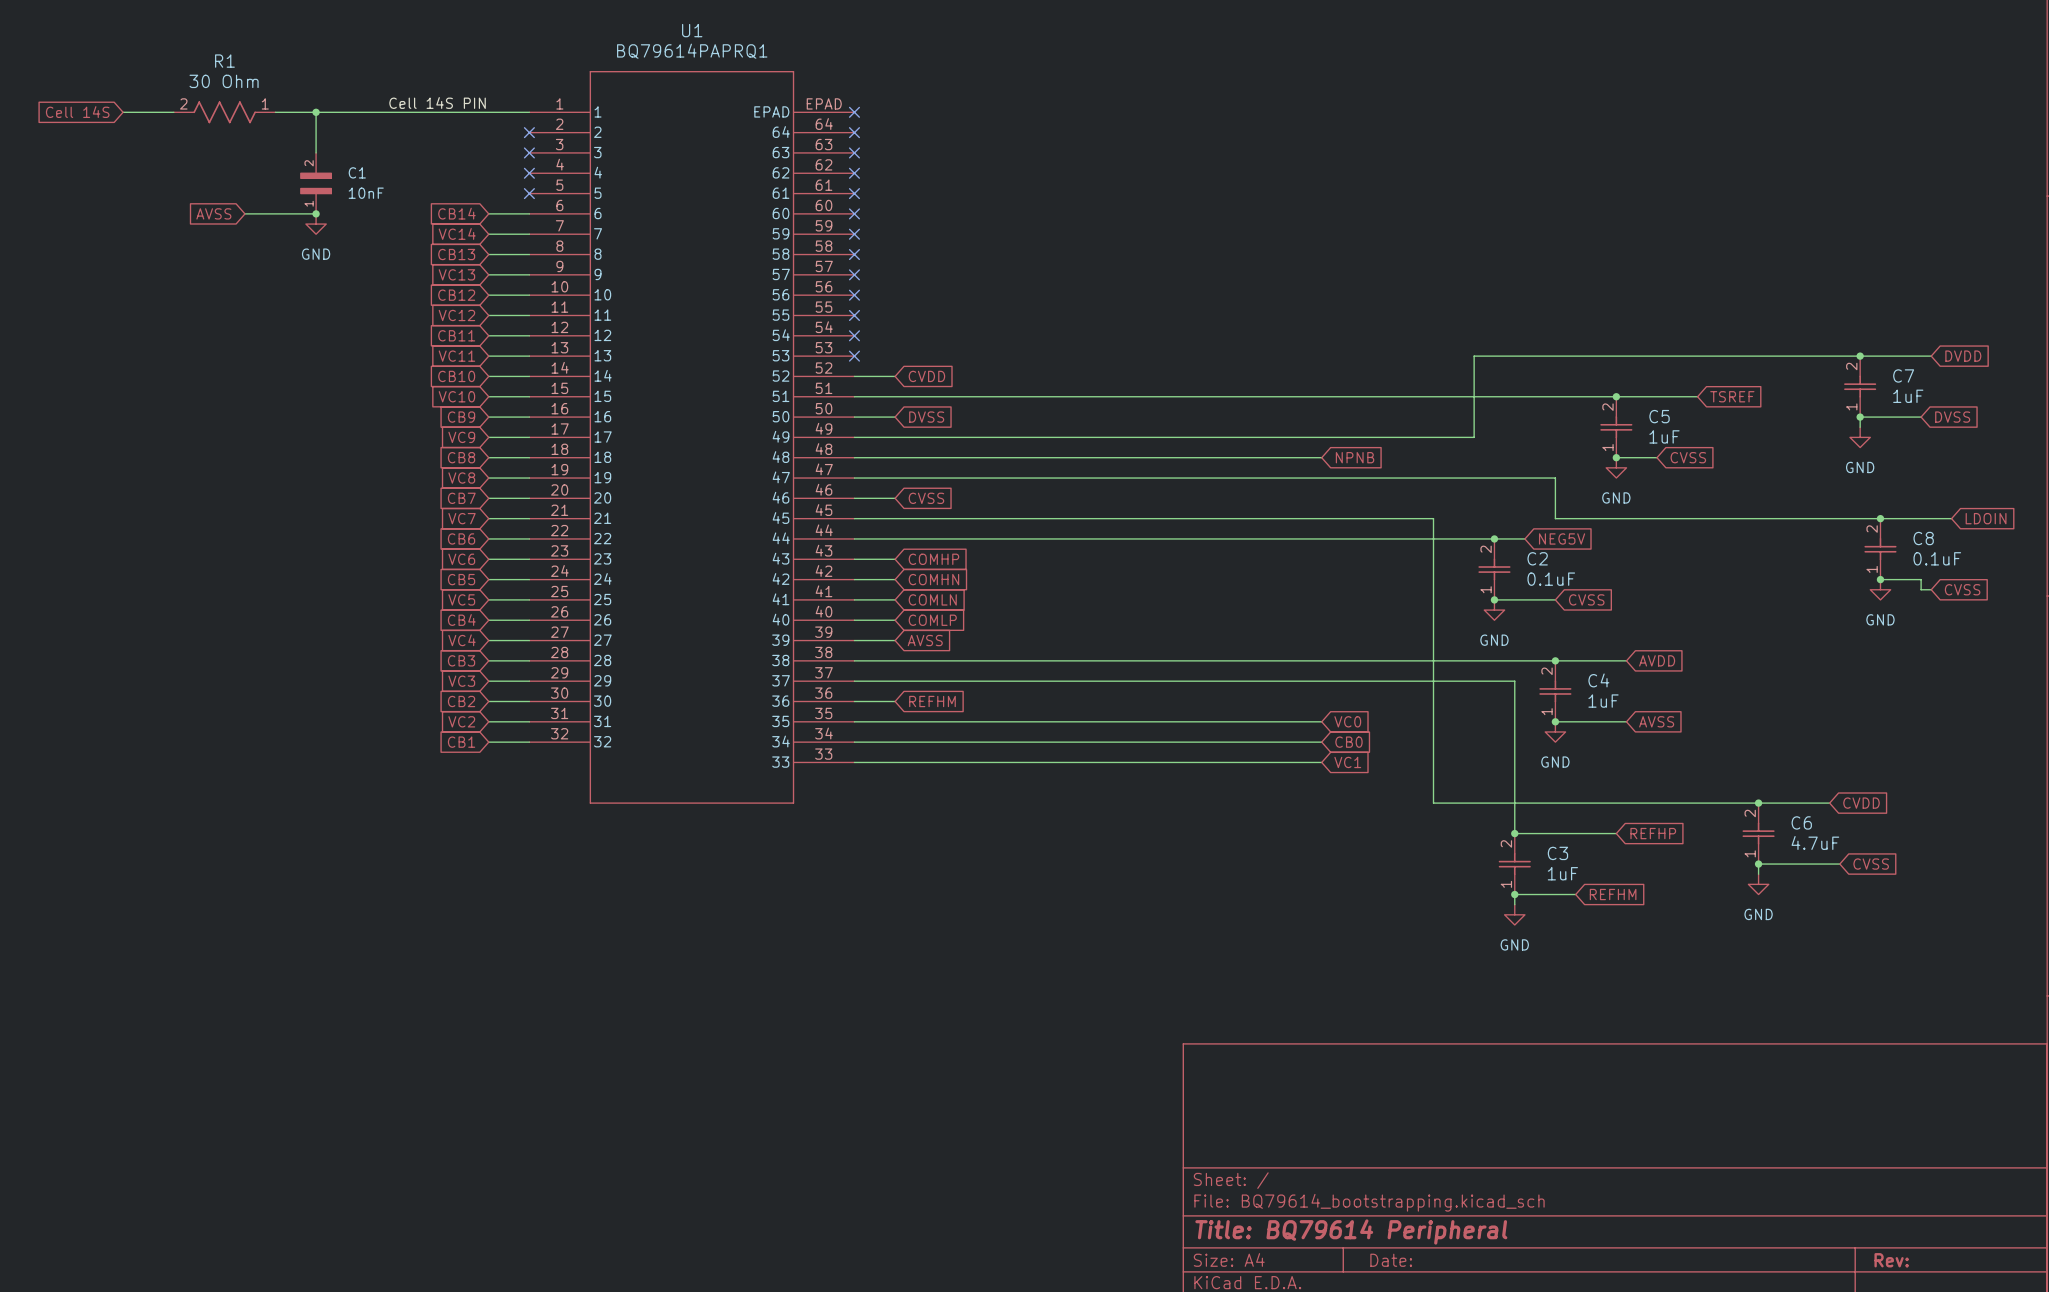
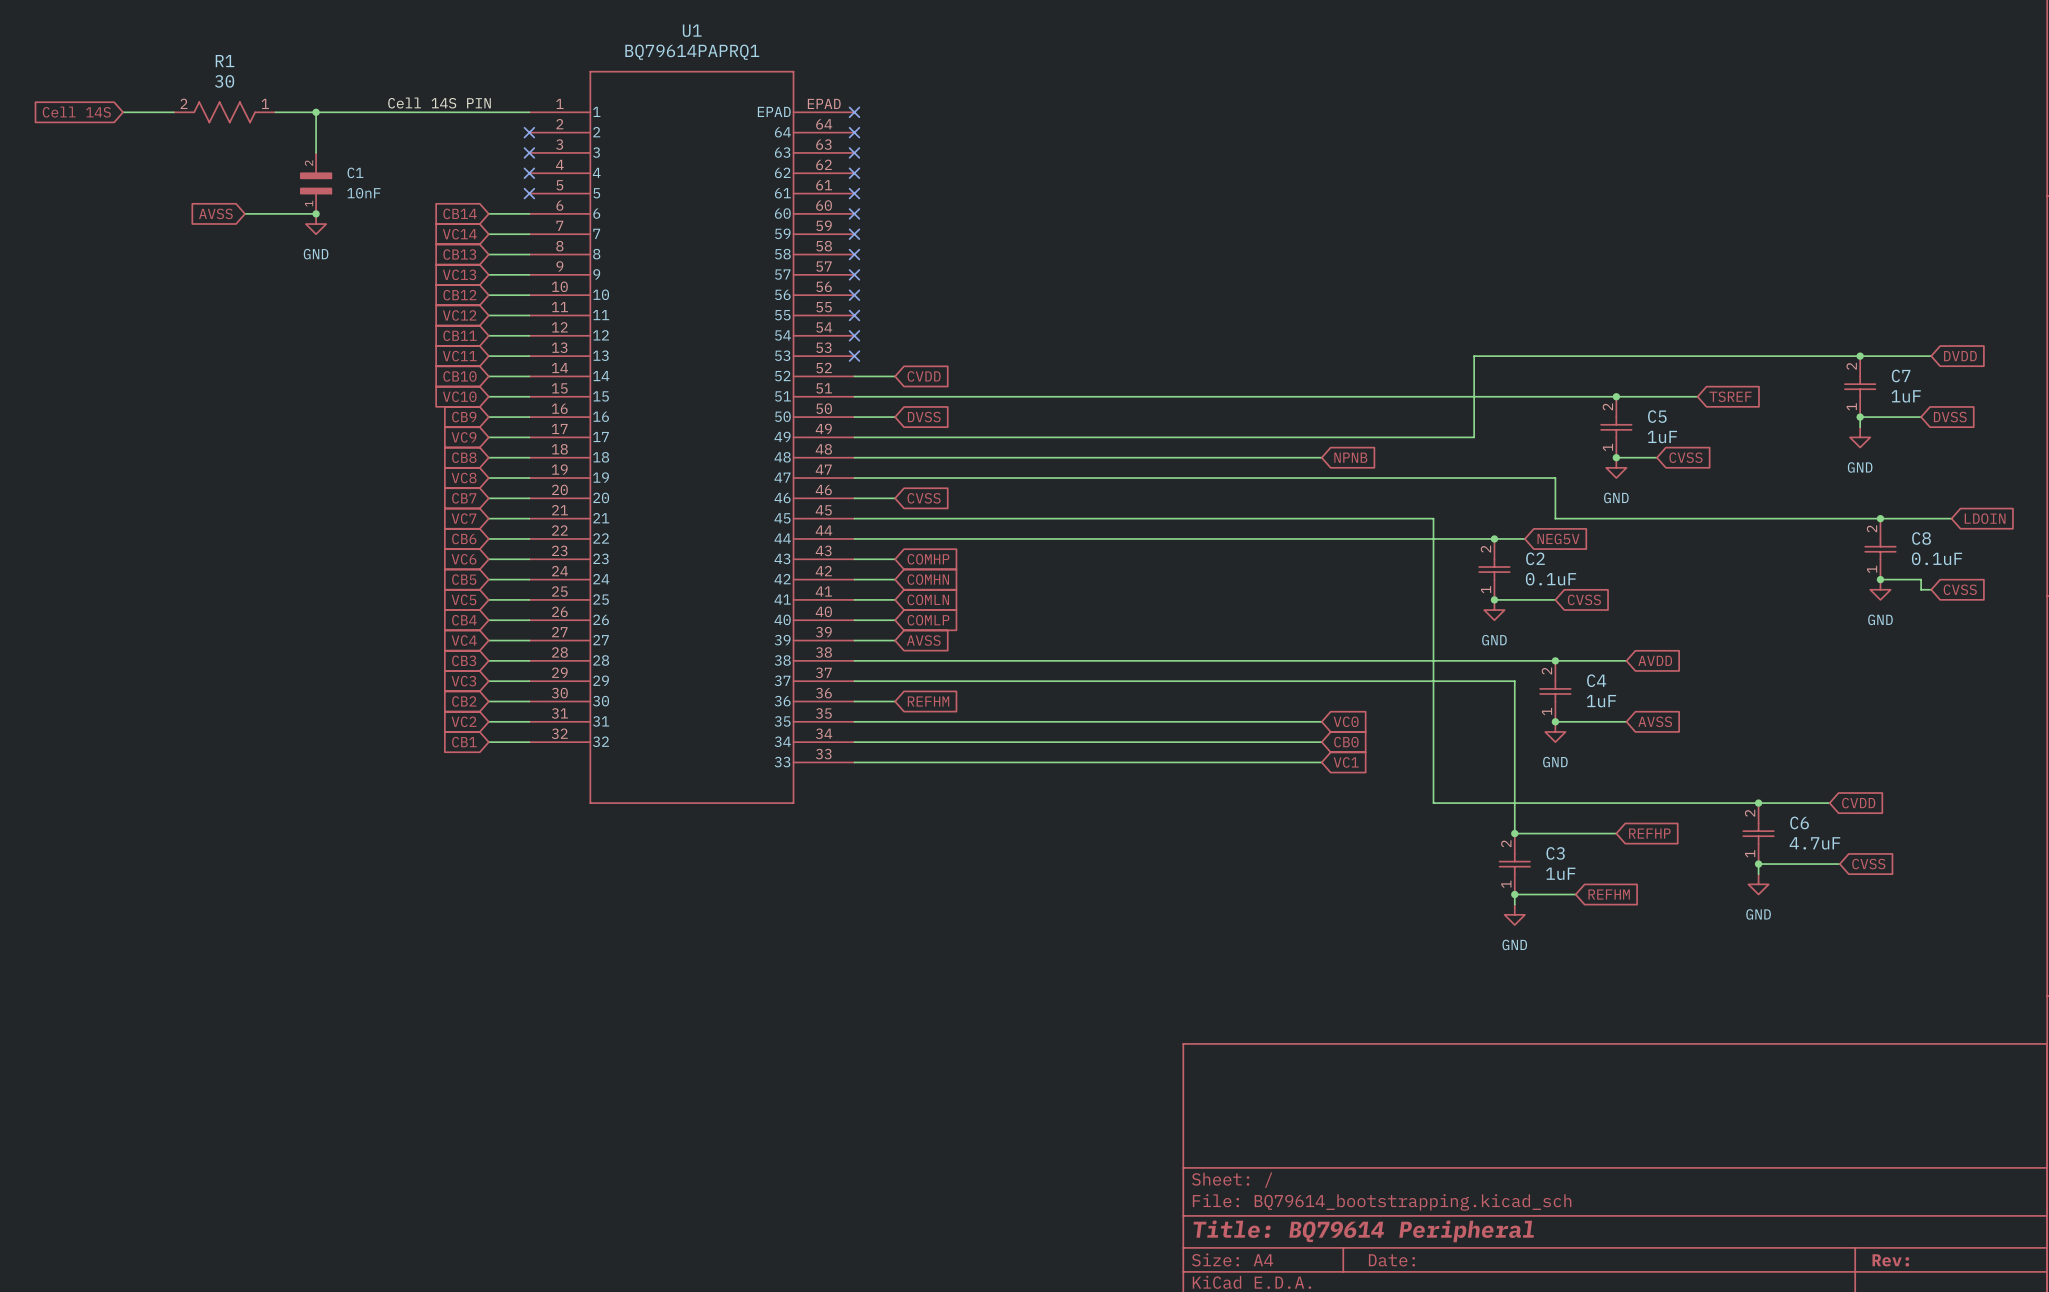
R1 value: 30 Ohm (224, 81) -> 30 (224, 81)

